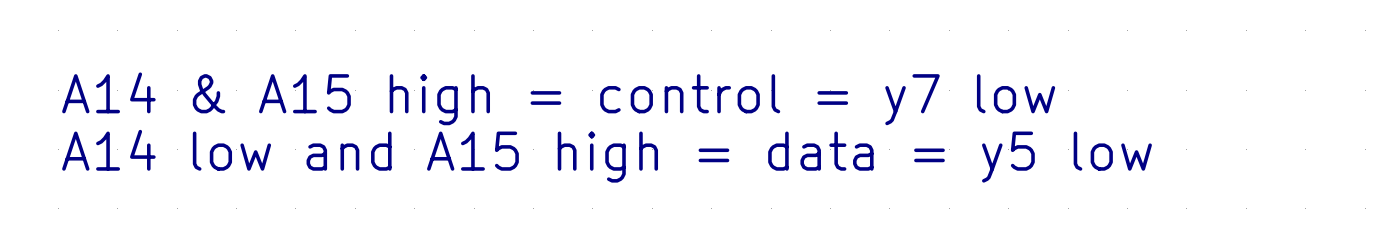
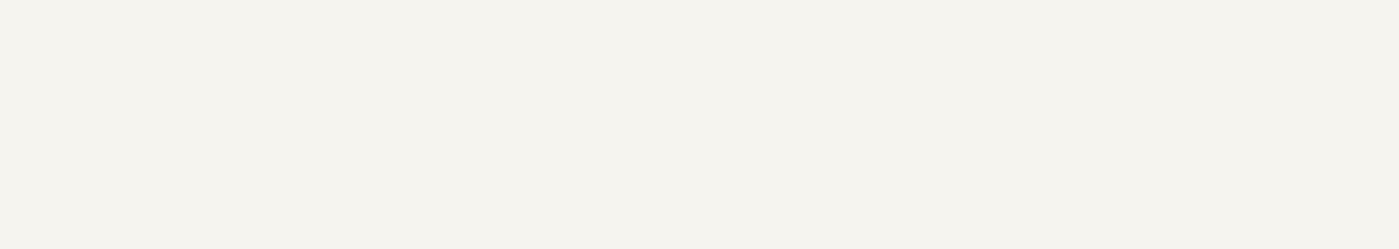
text: A14 & A15 high = control = y7 low (558, 98) -> none
text: A14 low and A15 high = data = y5 low (607, 156) -> none

